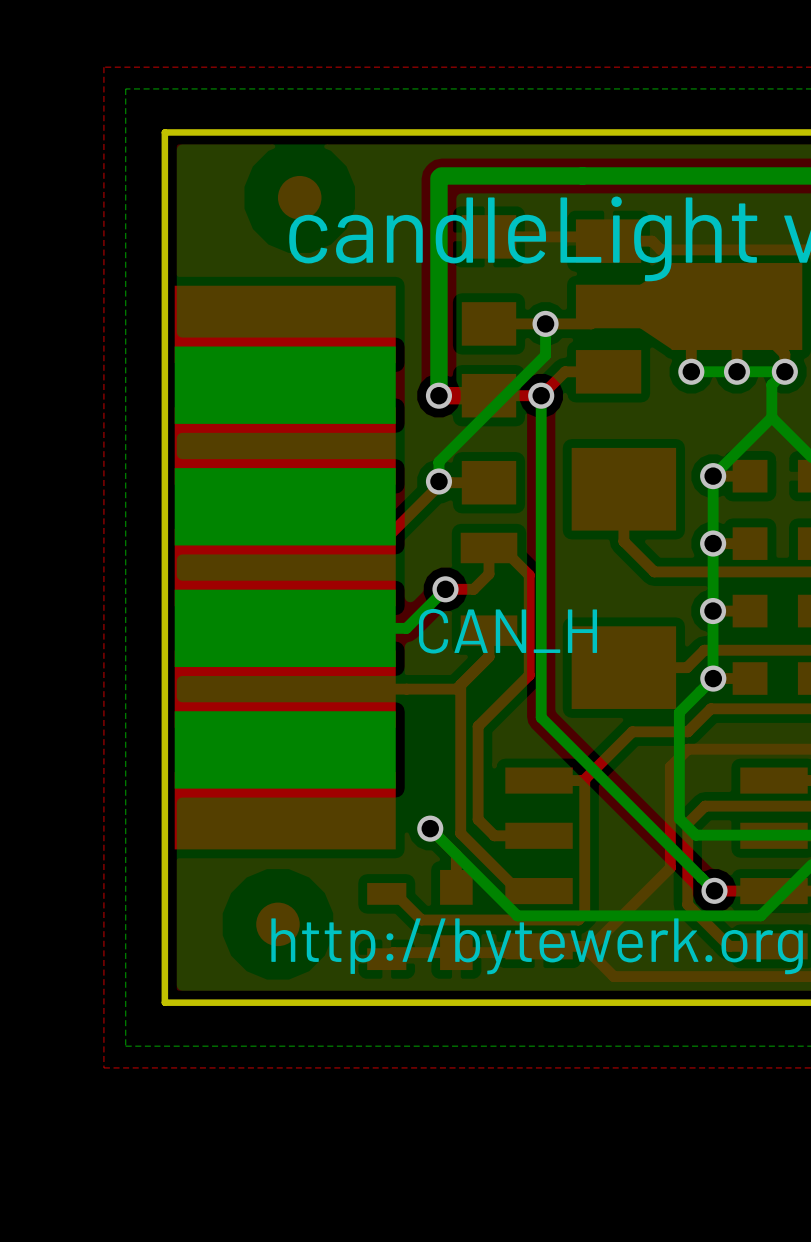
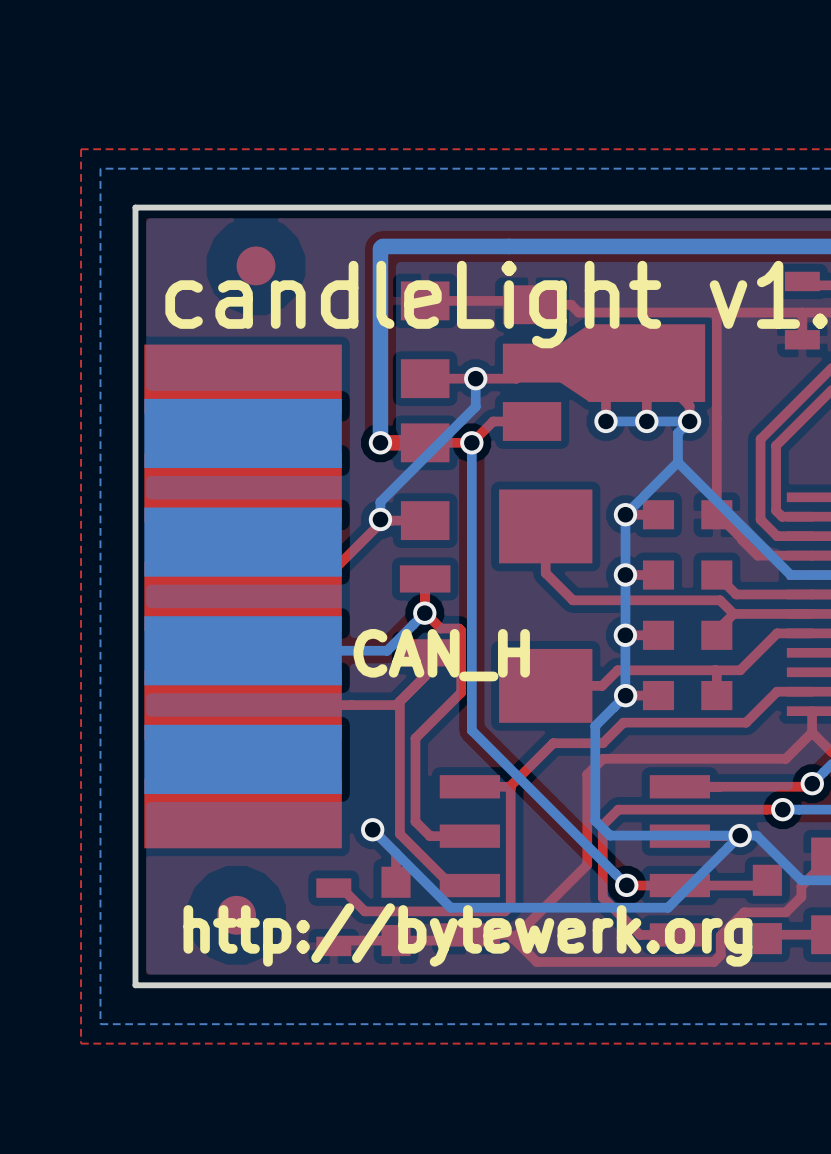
top track: (489, 547) (502, 547) (529, 575) (529, 605) -> (425, 602) (425, 612) (440, 628) (459, 628) (461, 630)
top track: (489, 574) (473, 589) (445, 589) -> none
bottom track: (445, 589) (406, 628) -> (424, 613) (387, 650) (351, 650)
via position: (445, 589) -> (424, 613)

